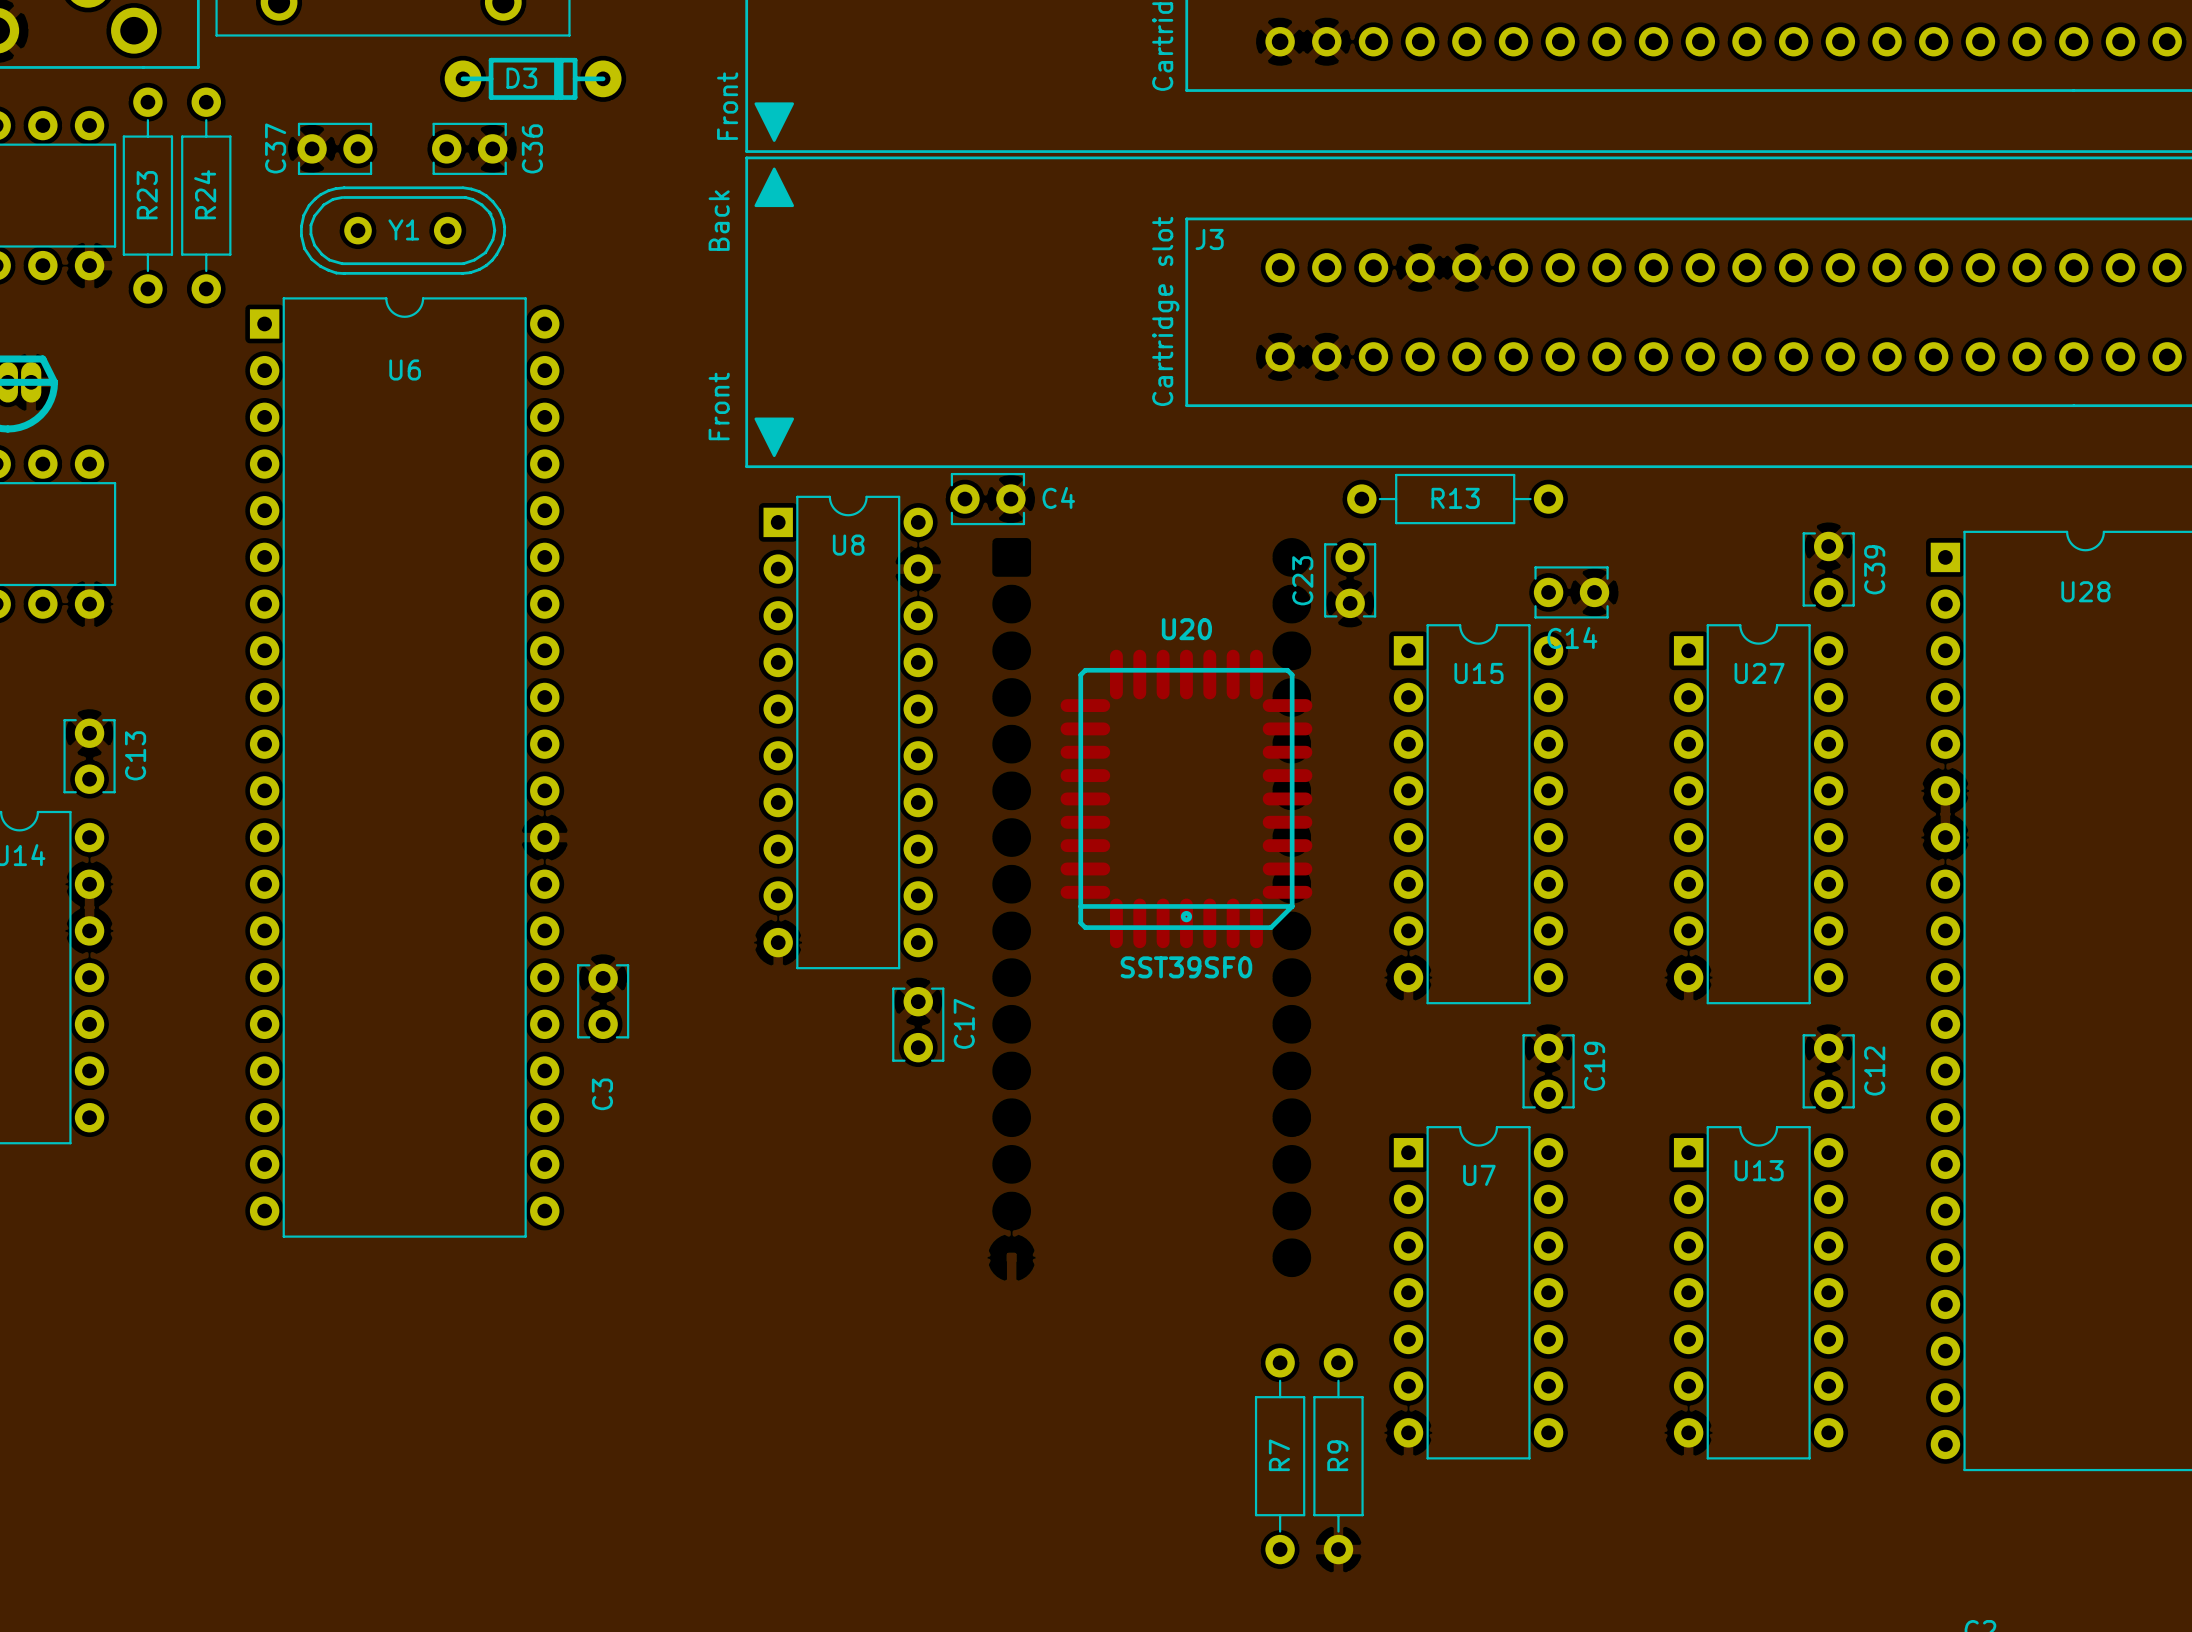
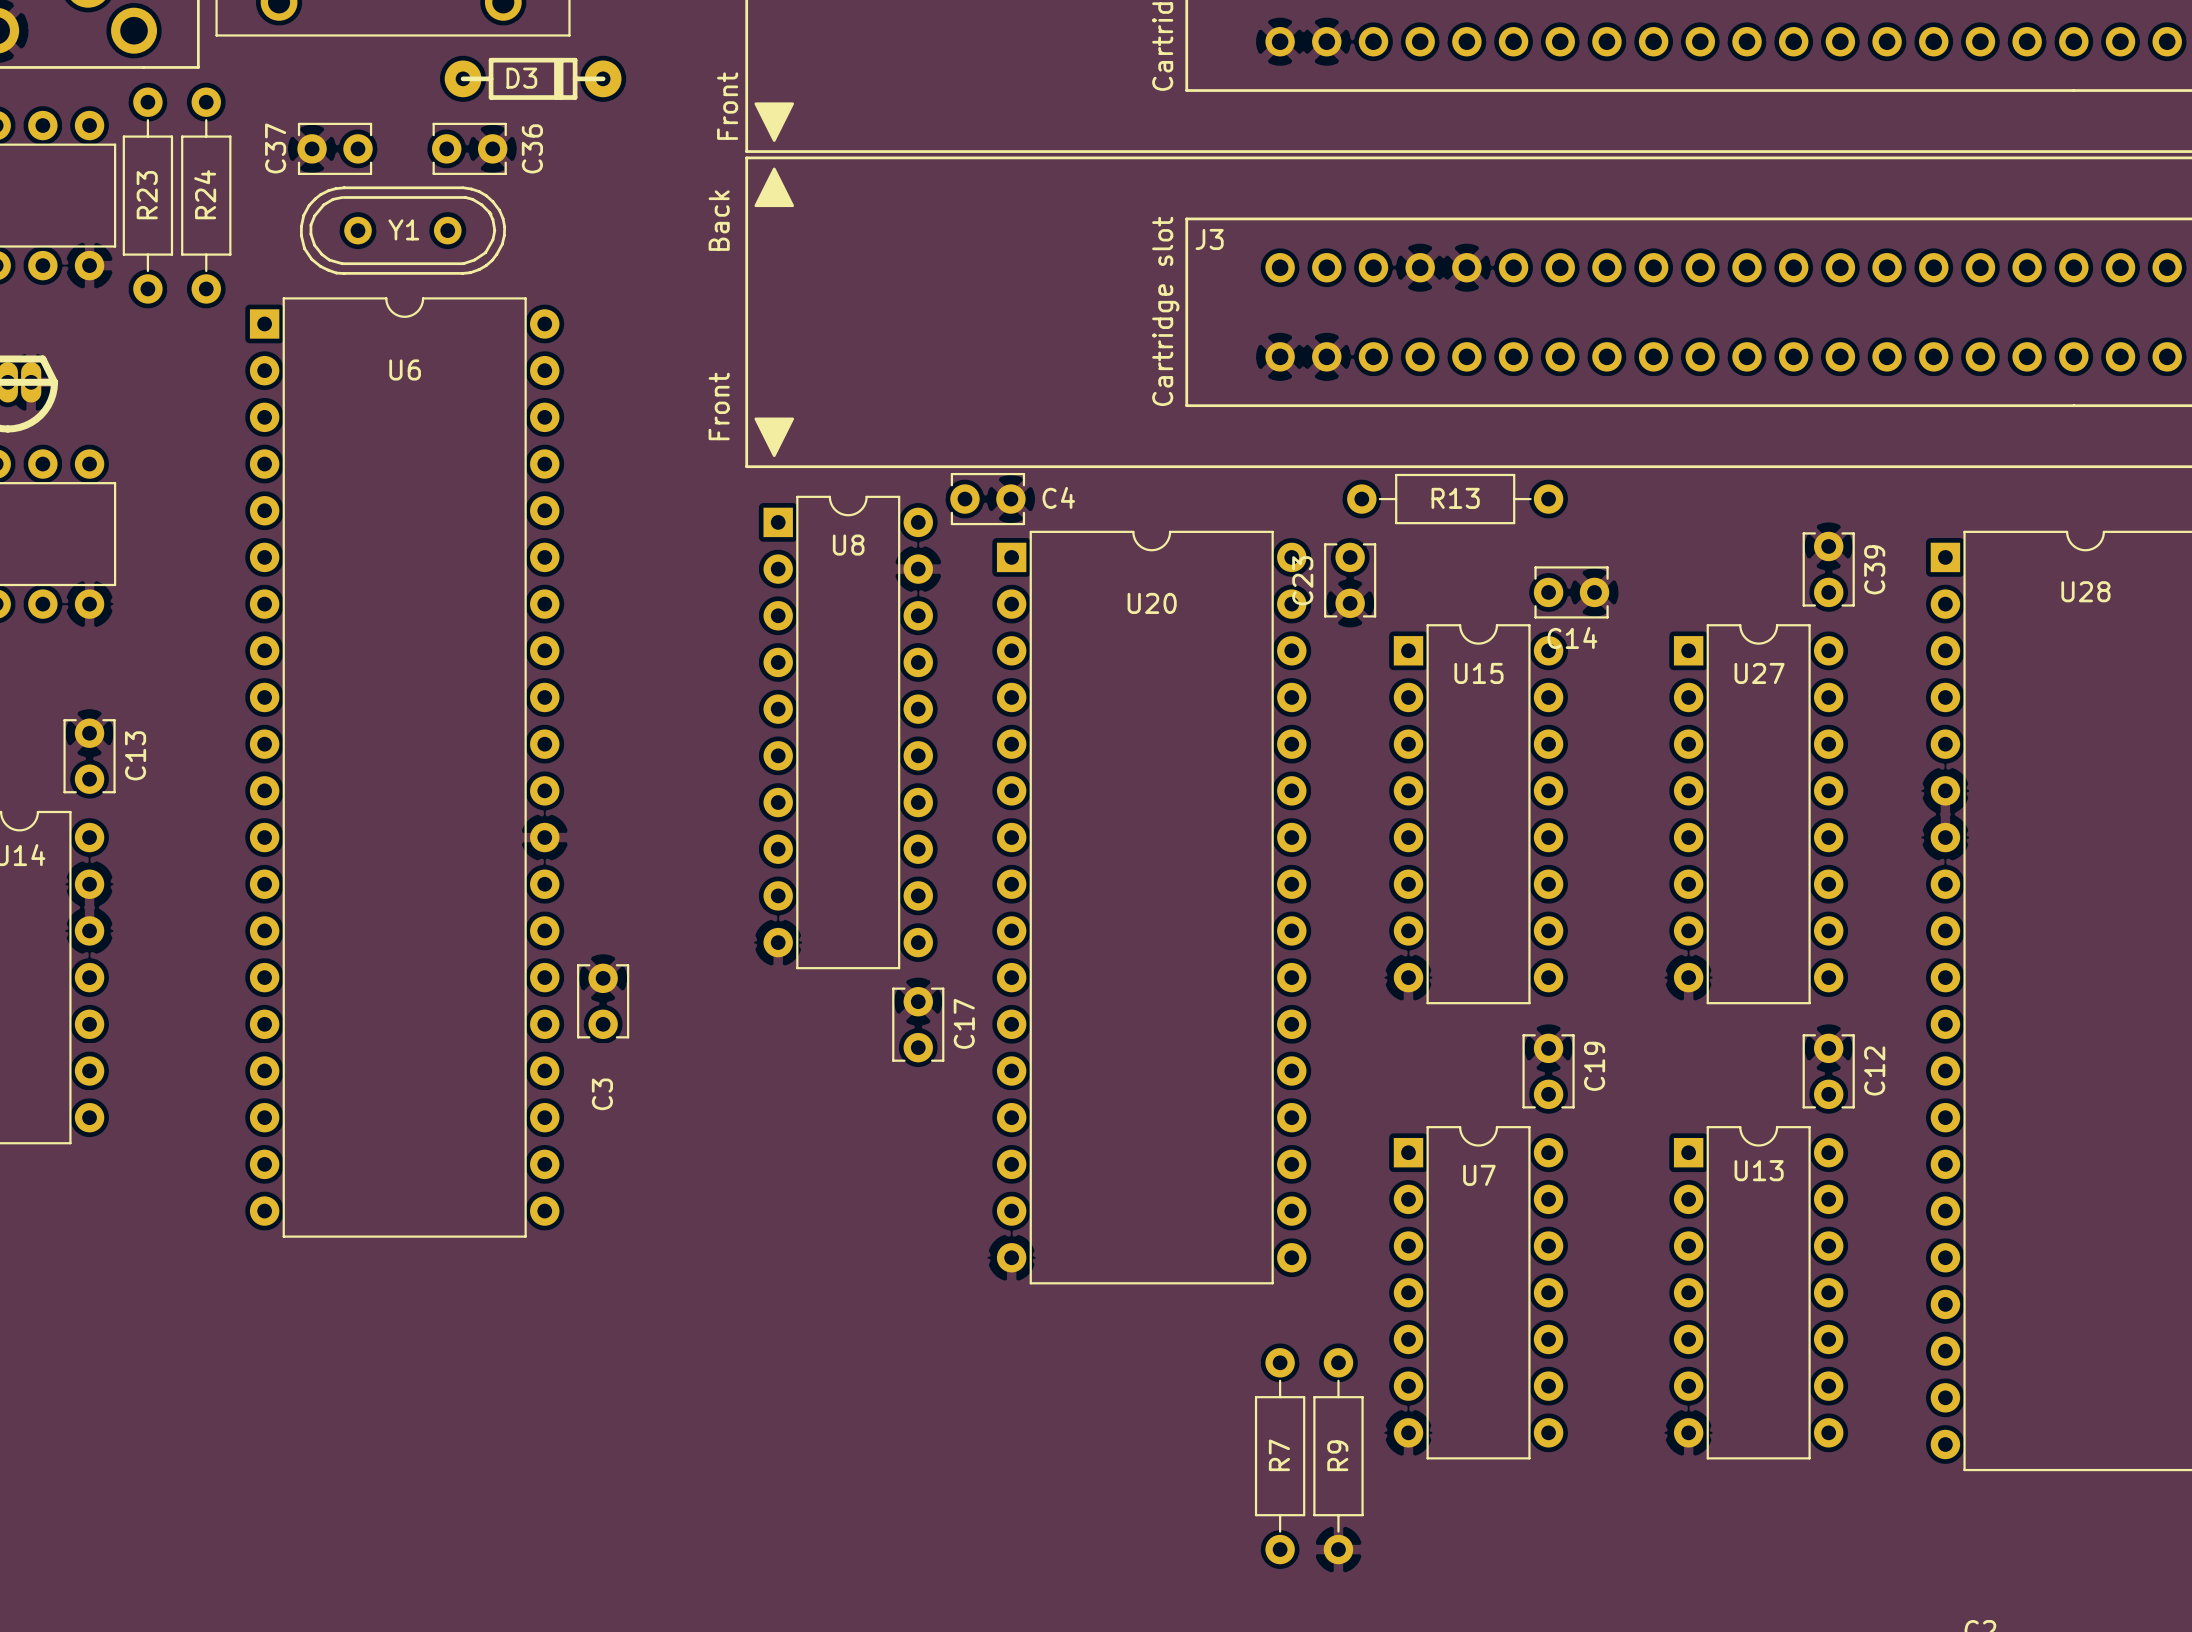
U20 name position: U20 (1186, 629) -> U20 (1152, 603)
U20 footprint: [1060, 649, 1313, 949] -> [996, 530, 1307, 1285]
U20 value: SST39SF0 (1186, 967) -> none

